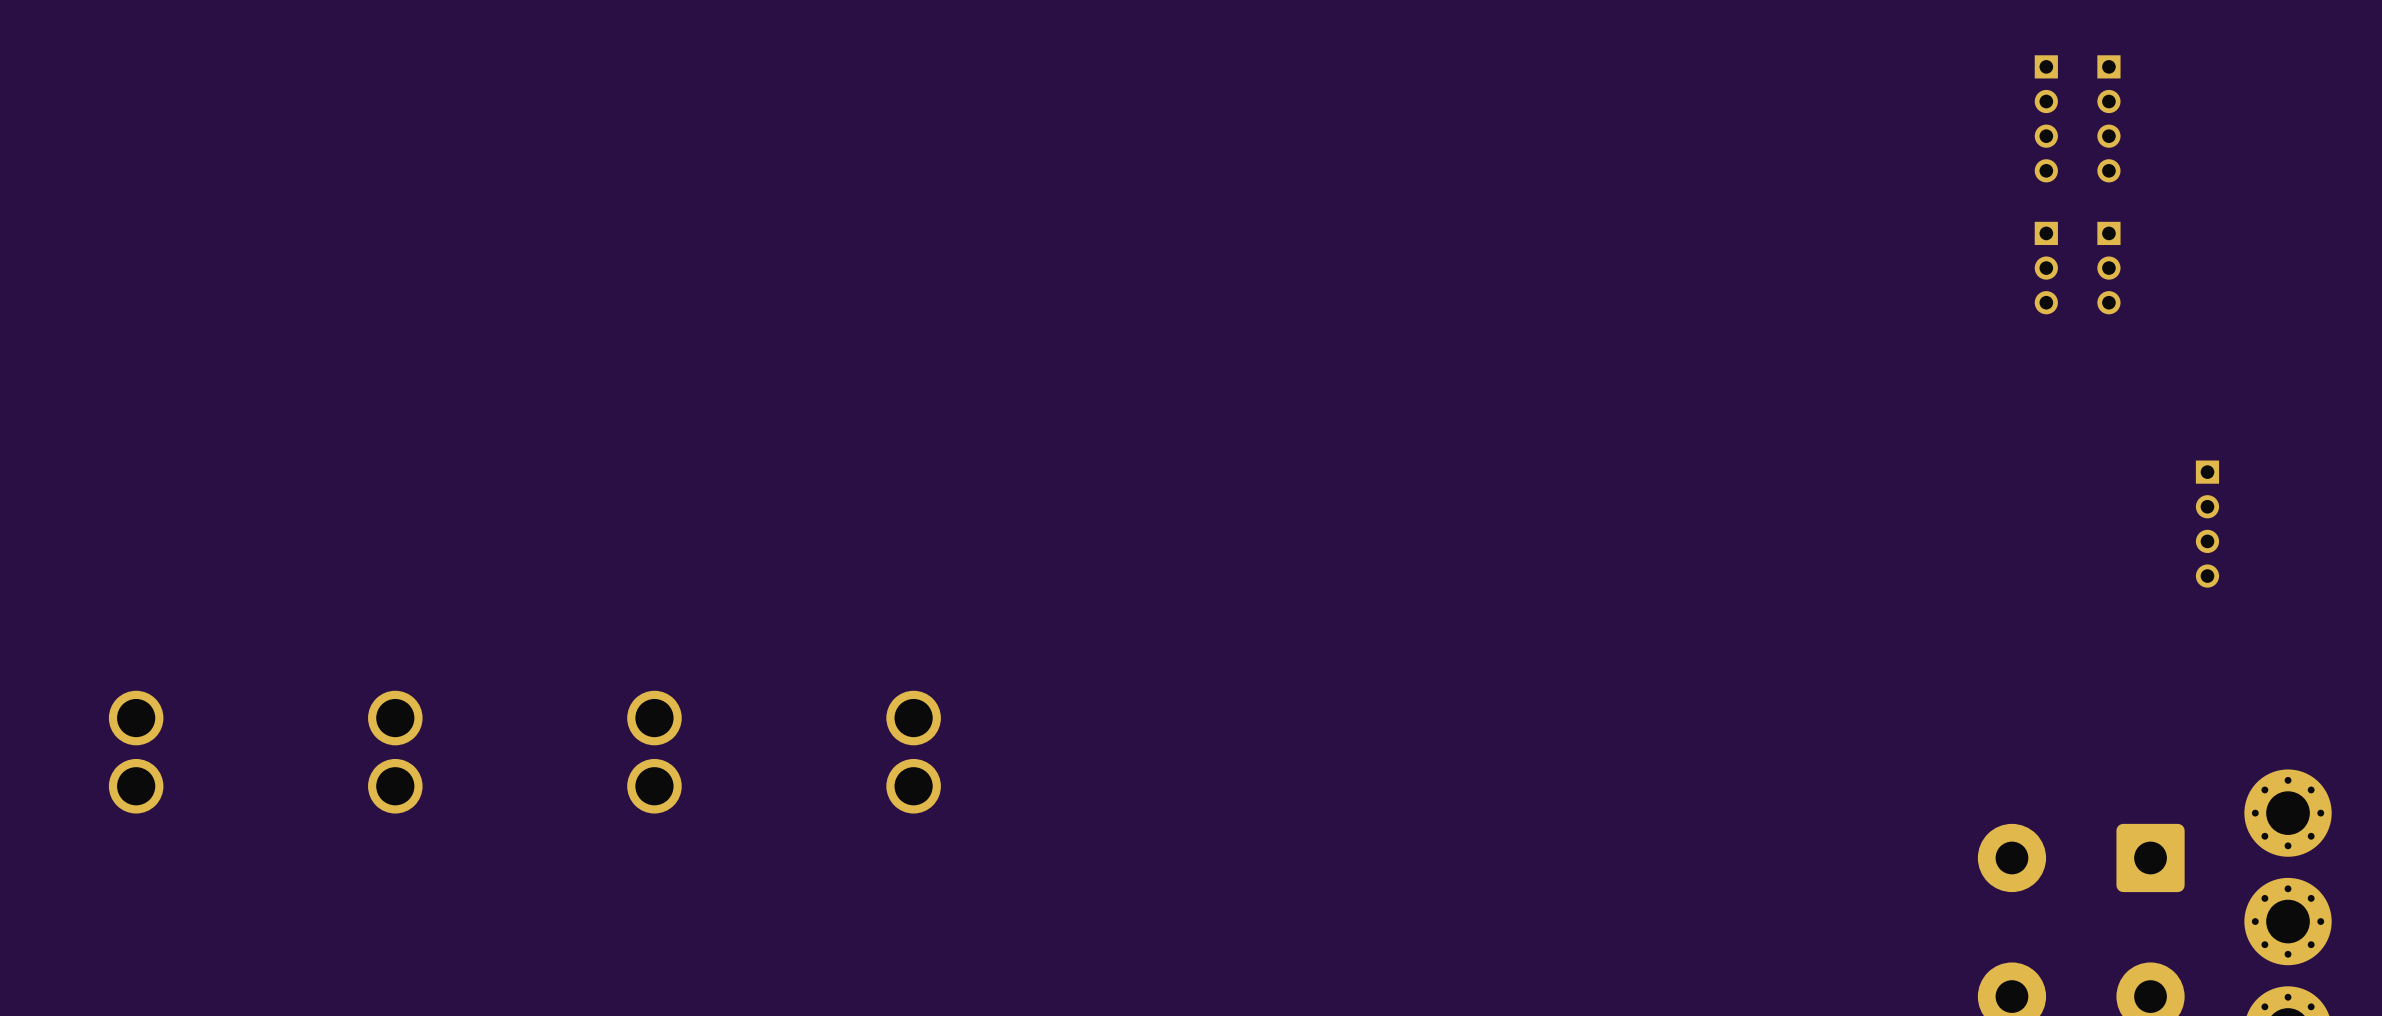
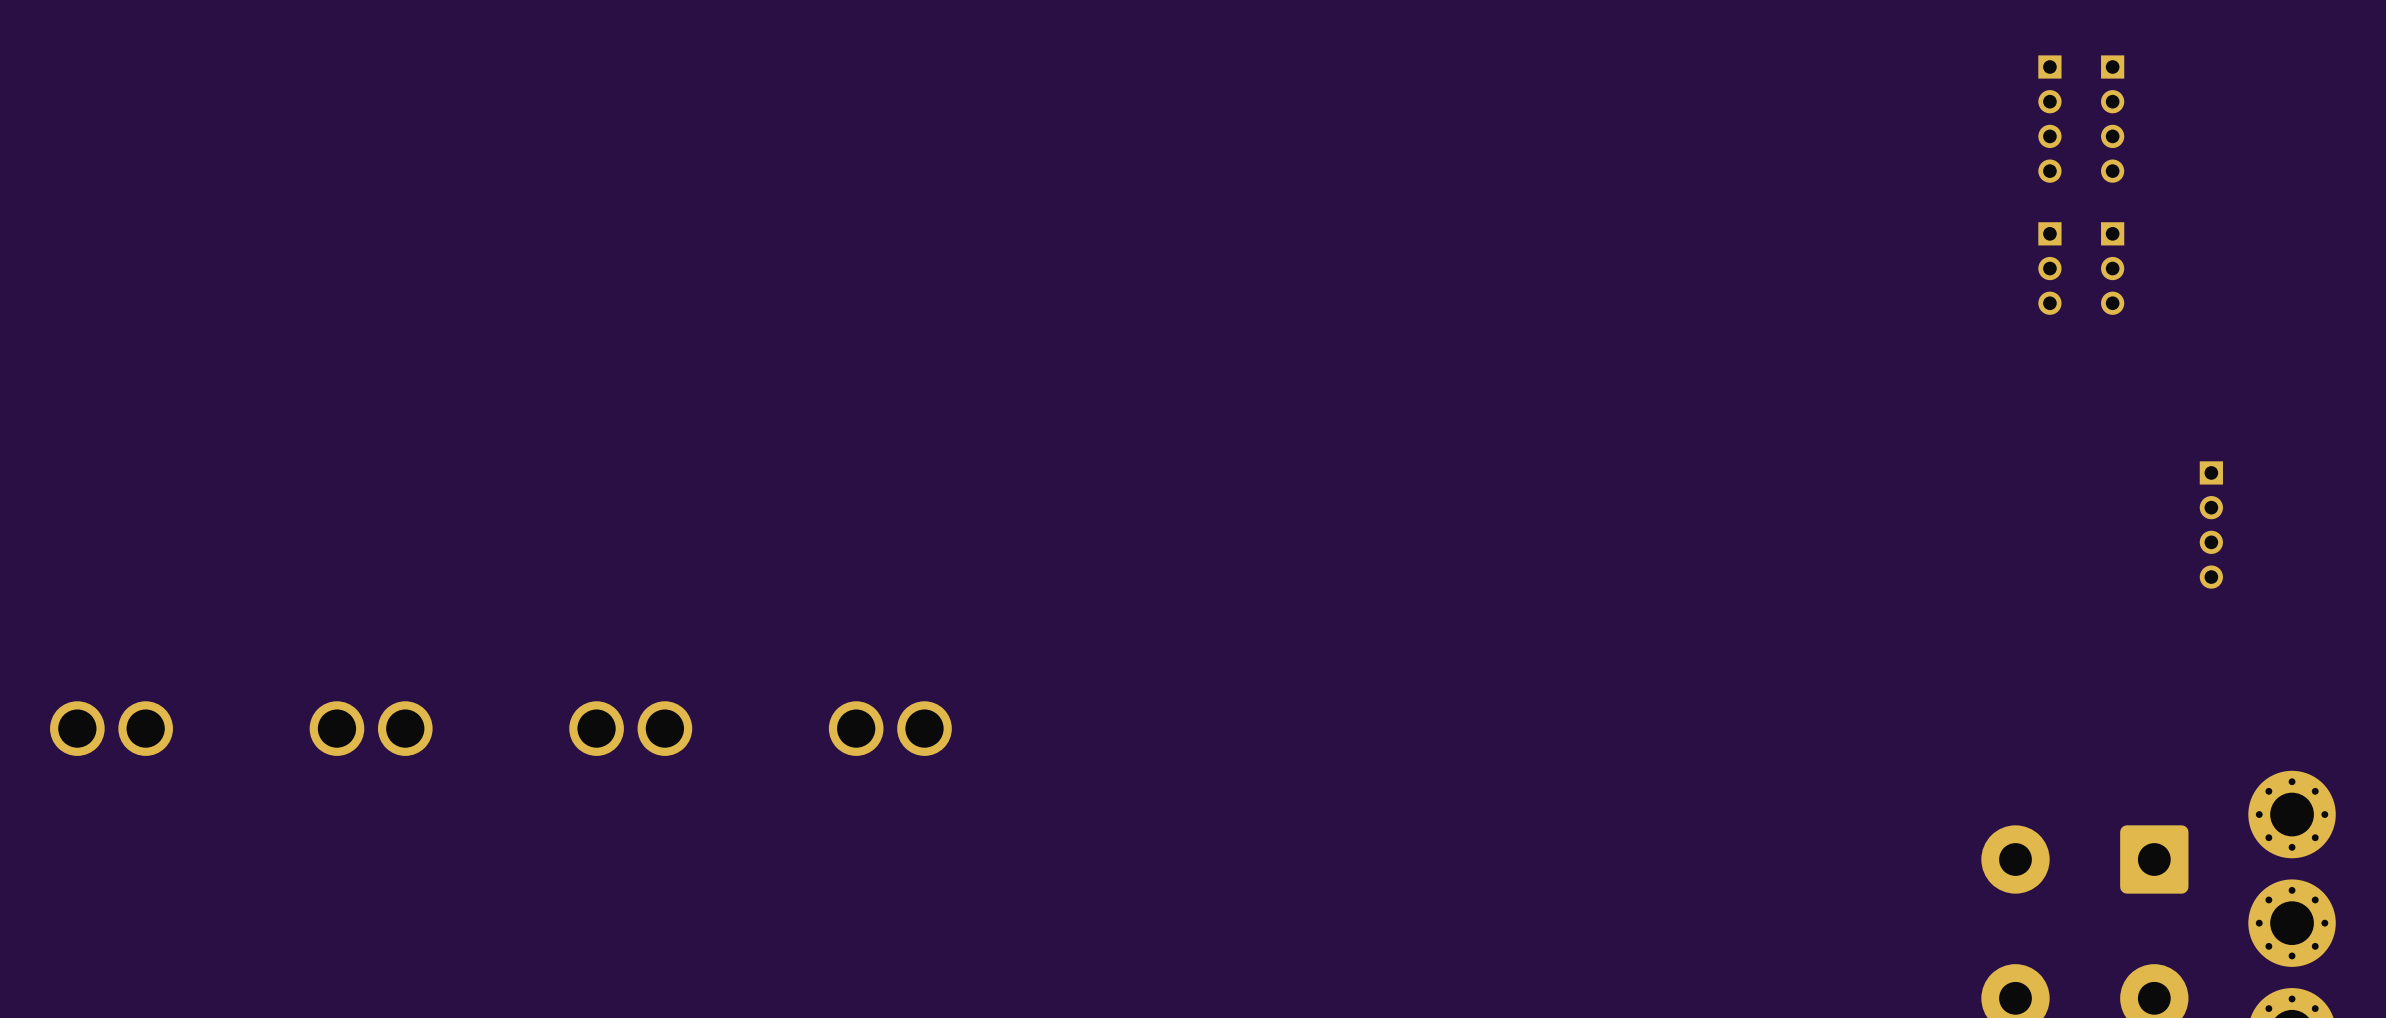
part rotation: 0° (136, 752) -> 90° clockwise (111, 728)
part rotation: 0° (395, 752) -> 90° clockwise (371, 728)
part rotation: 0° (654, 752) -> 90° clockwise (630, 728)
part rotation: 0° (913, 752) -> 90° clockwise (890, 728)

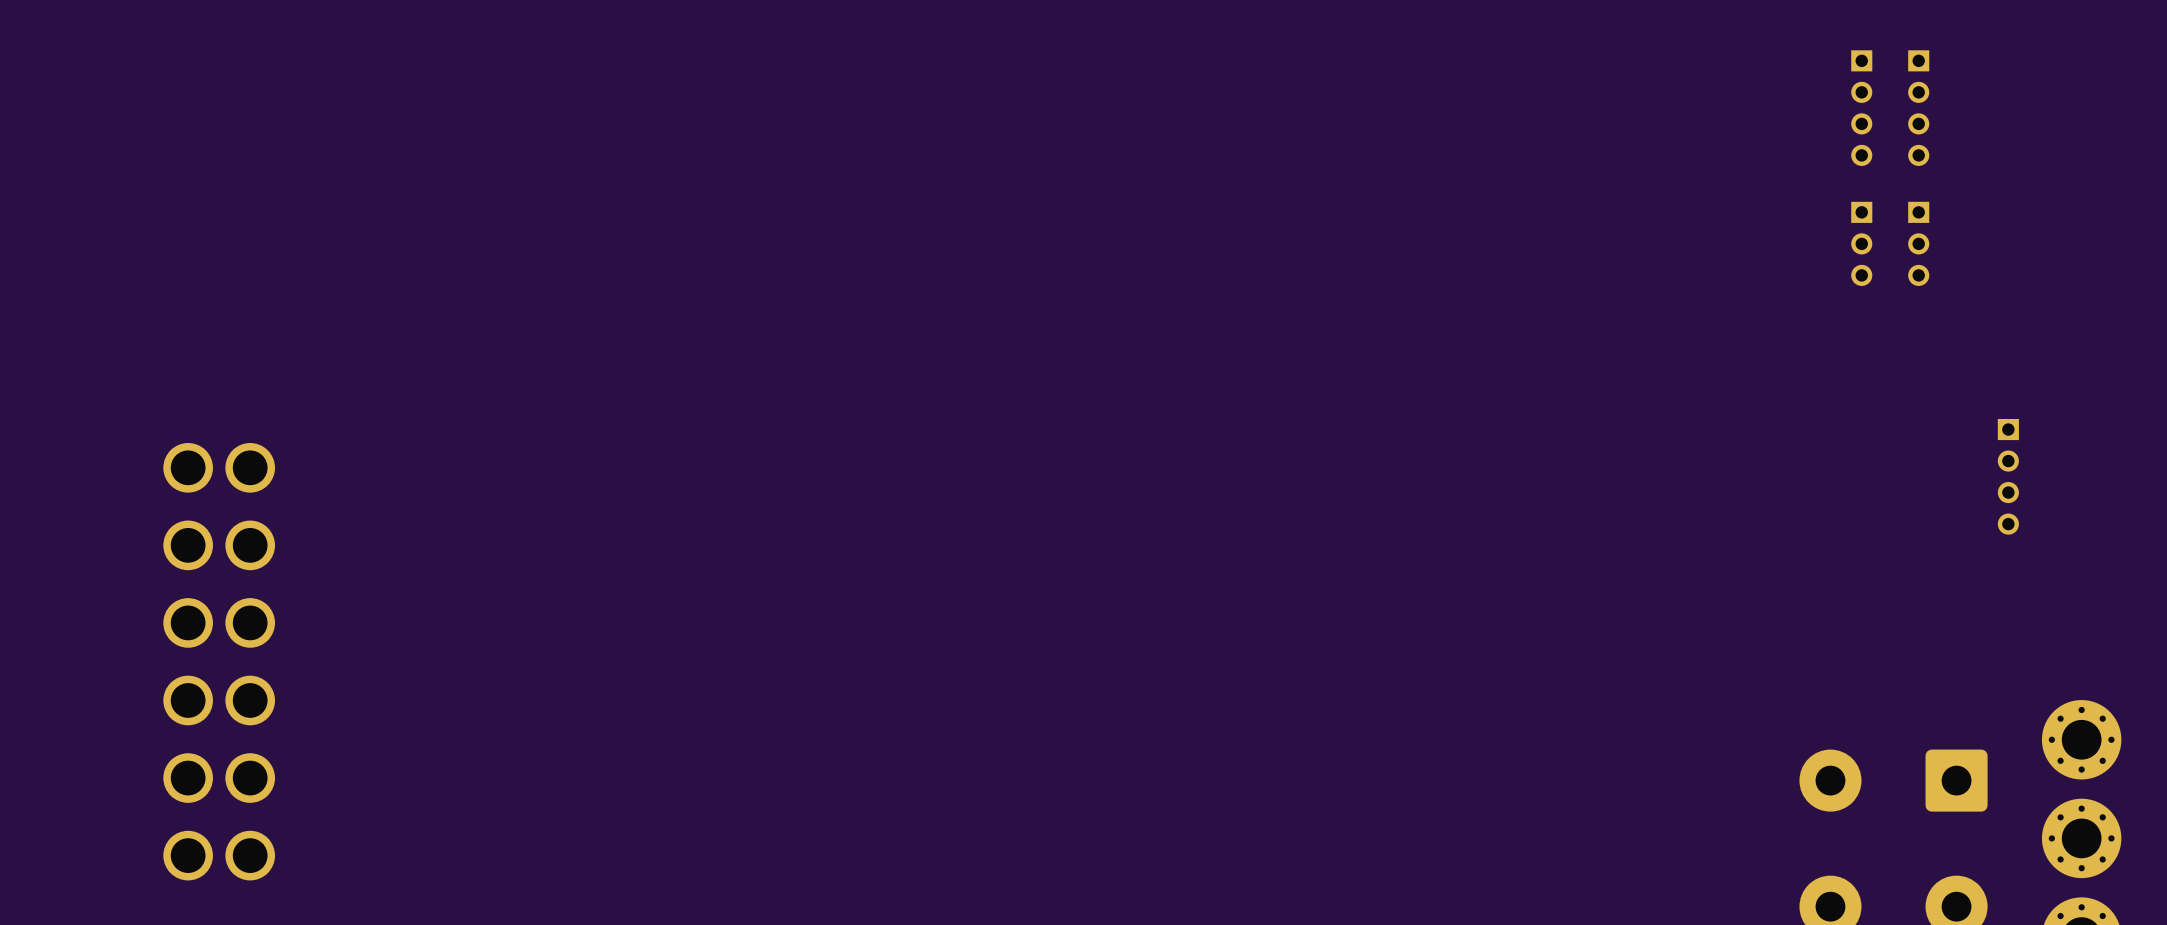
part: none -> (219, 467)
part: none -> (219, 545)
part: none -> (219, 622)
part: (111, 728) -> none
part: (371, 728) -> none
part: (630, 728) -> none
part: (890, 728) -> none
part: none -> (219, 700)
part: none -> (219, 778)
part: none -> (219, 855)

